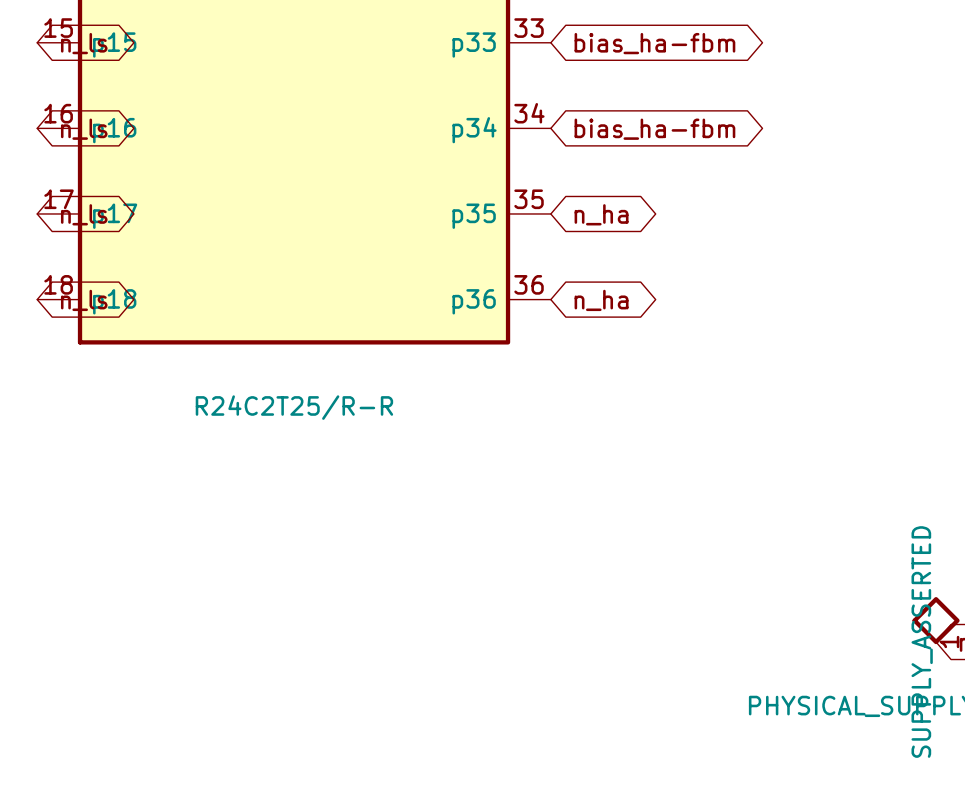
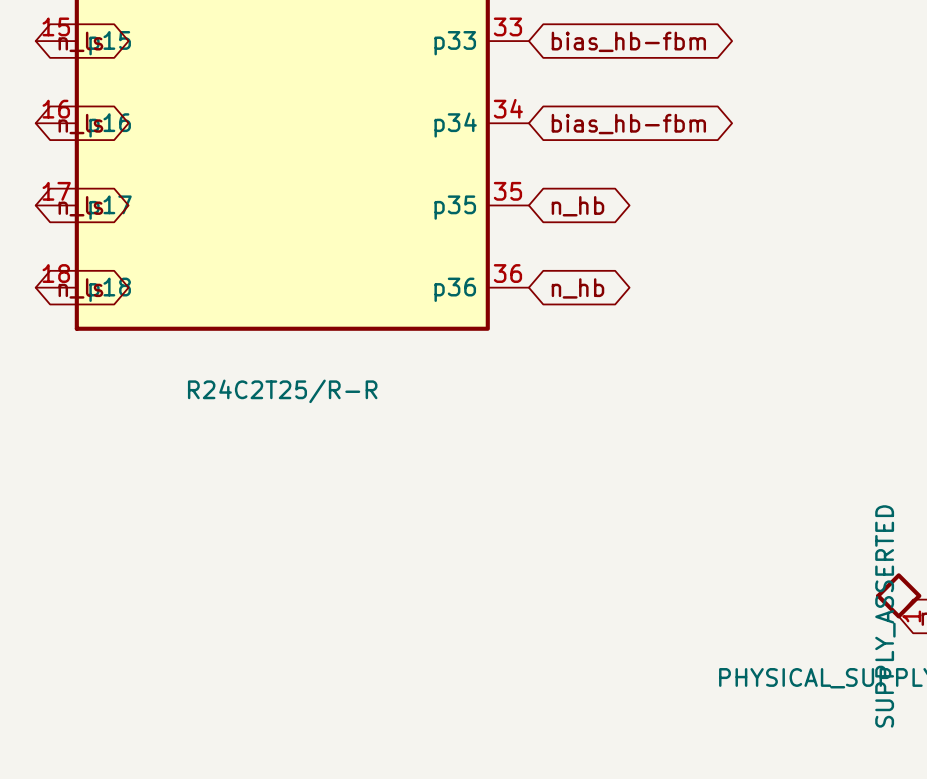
global label: bias_ha-fbm (654, 43) -> bias_hb-fbm (628, 41)
global label: bias_ha-fbm (654, 129) -> bias_hb-fbm (628, 124)
global label: n_ha (601, 214) -> n_hb (577, 206)
global label: n_ha (601, 300) -> n_hb (577, 288)

